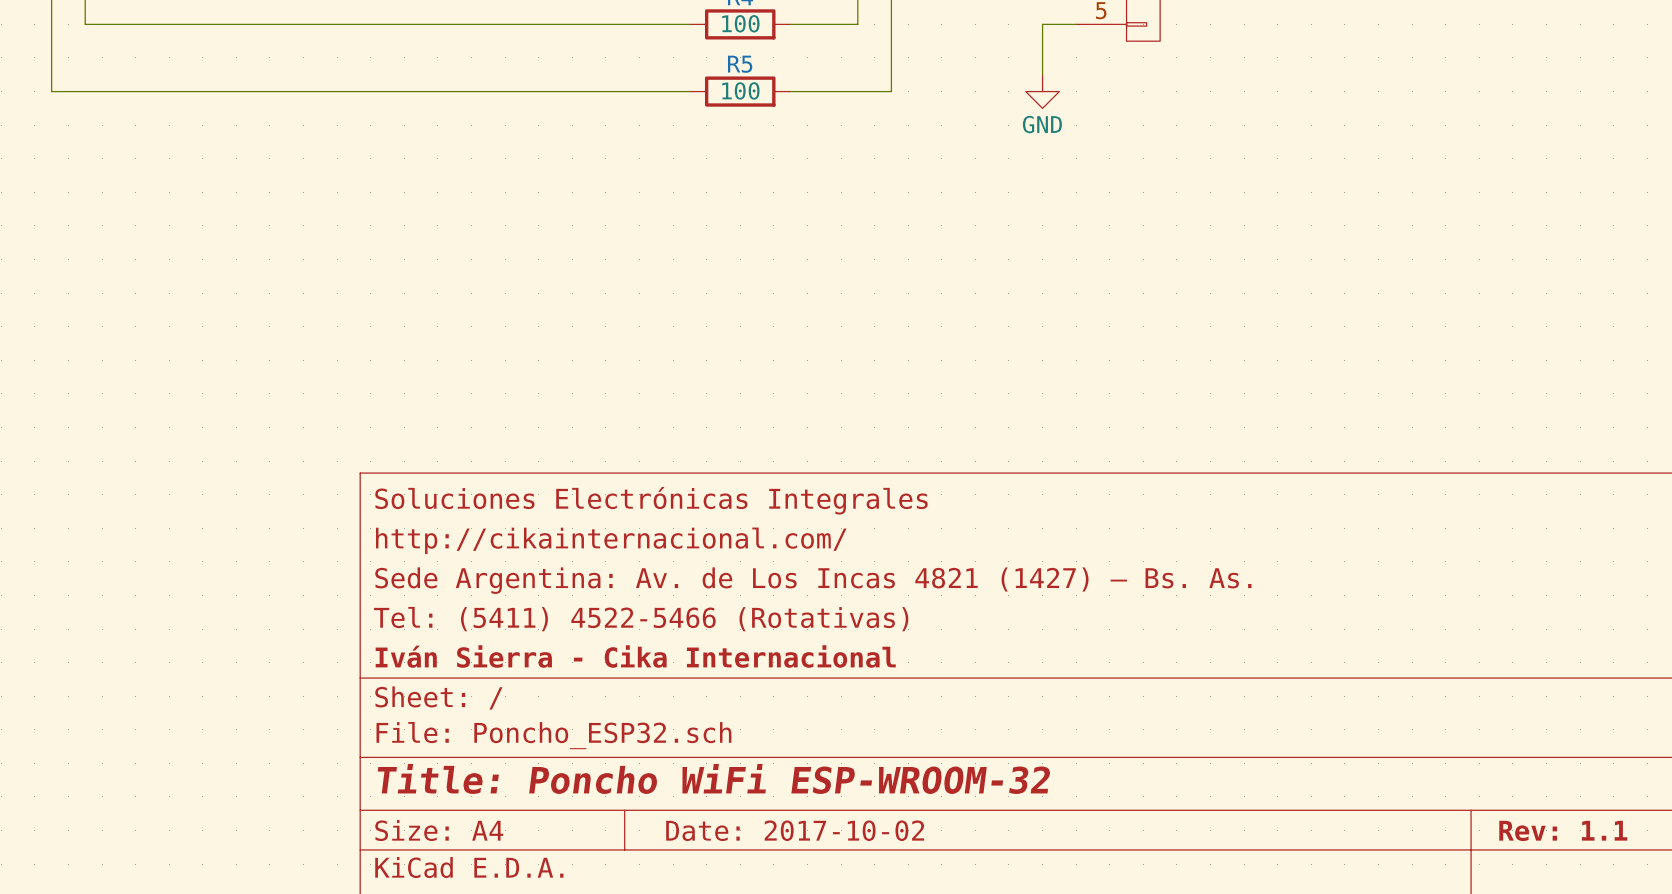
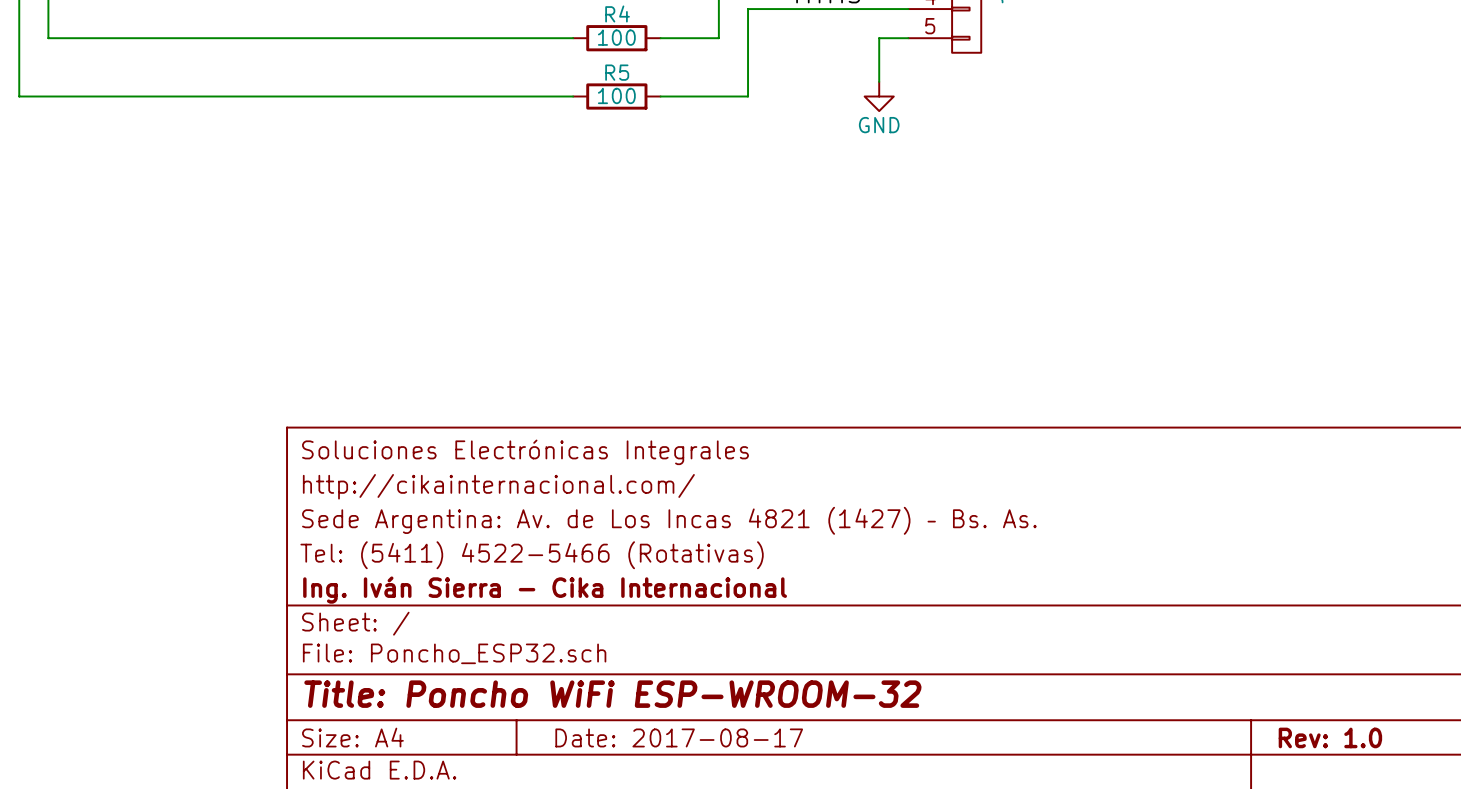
title block: Iván Sierra - Cika Internacional (635, 656) -> Ing. Iván Sierra - Cika Internacional (545, 590)
title block: Date: 2017-10-02 (795, 830) -> Date: 2017-08-17 (679, 737)
title block: Rev: 1.1 (1563, 830) -> Rev: 1.0 (1330, 737)

